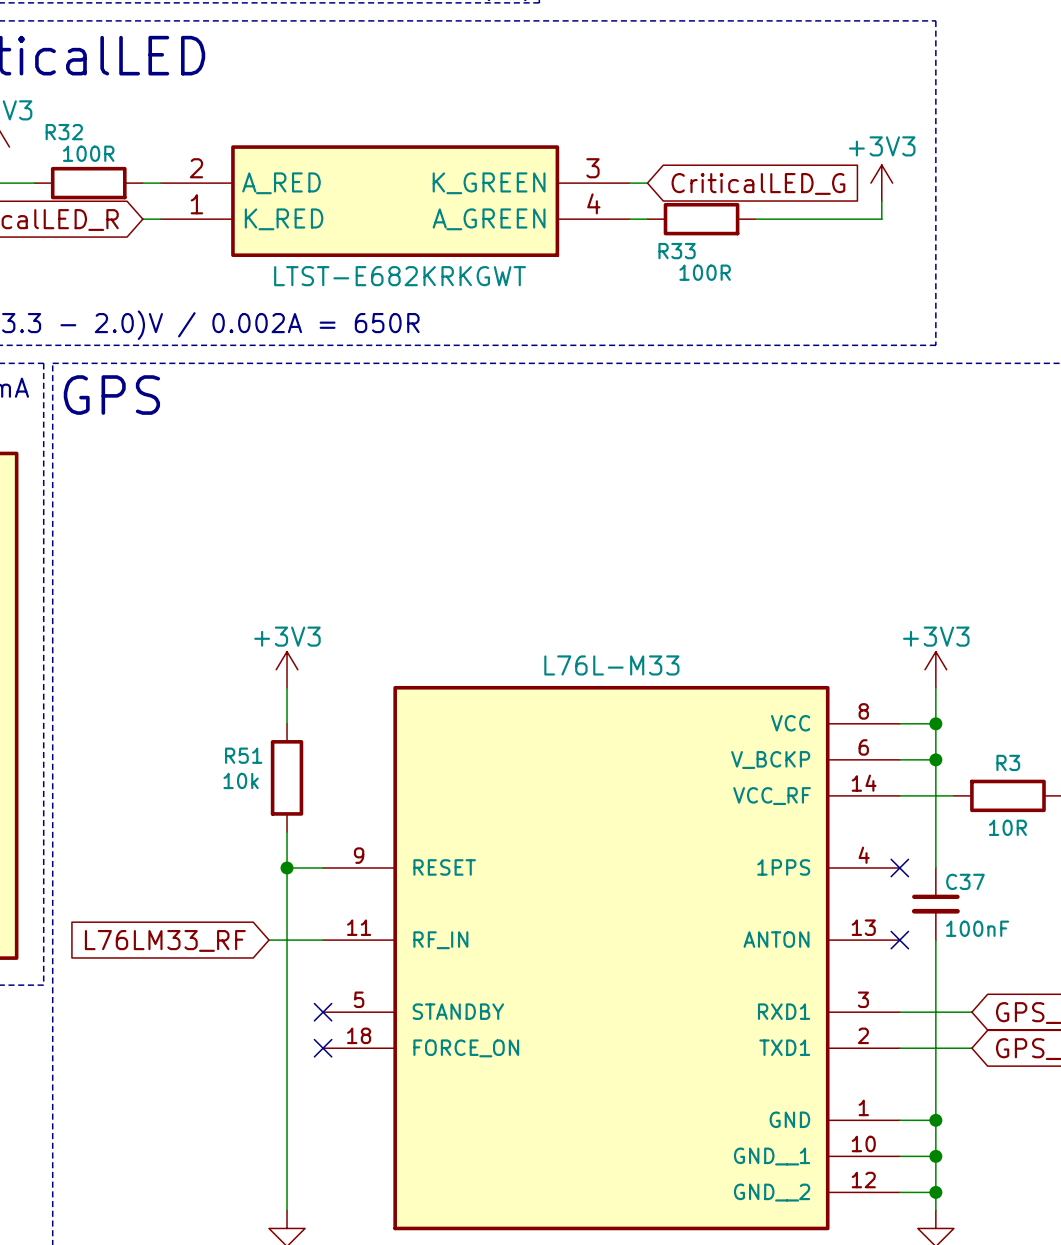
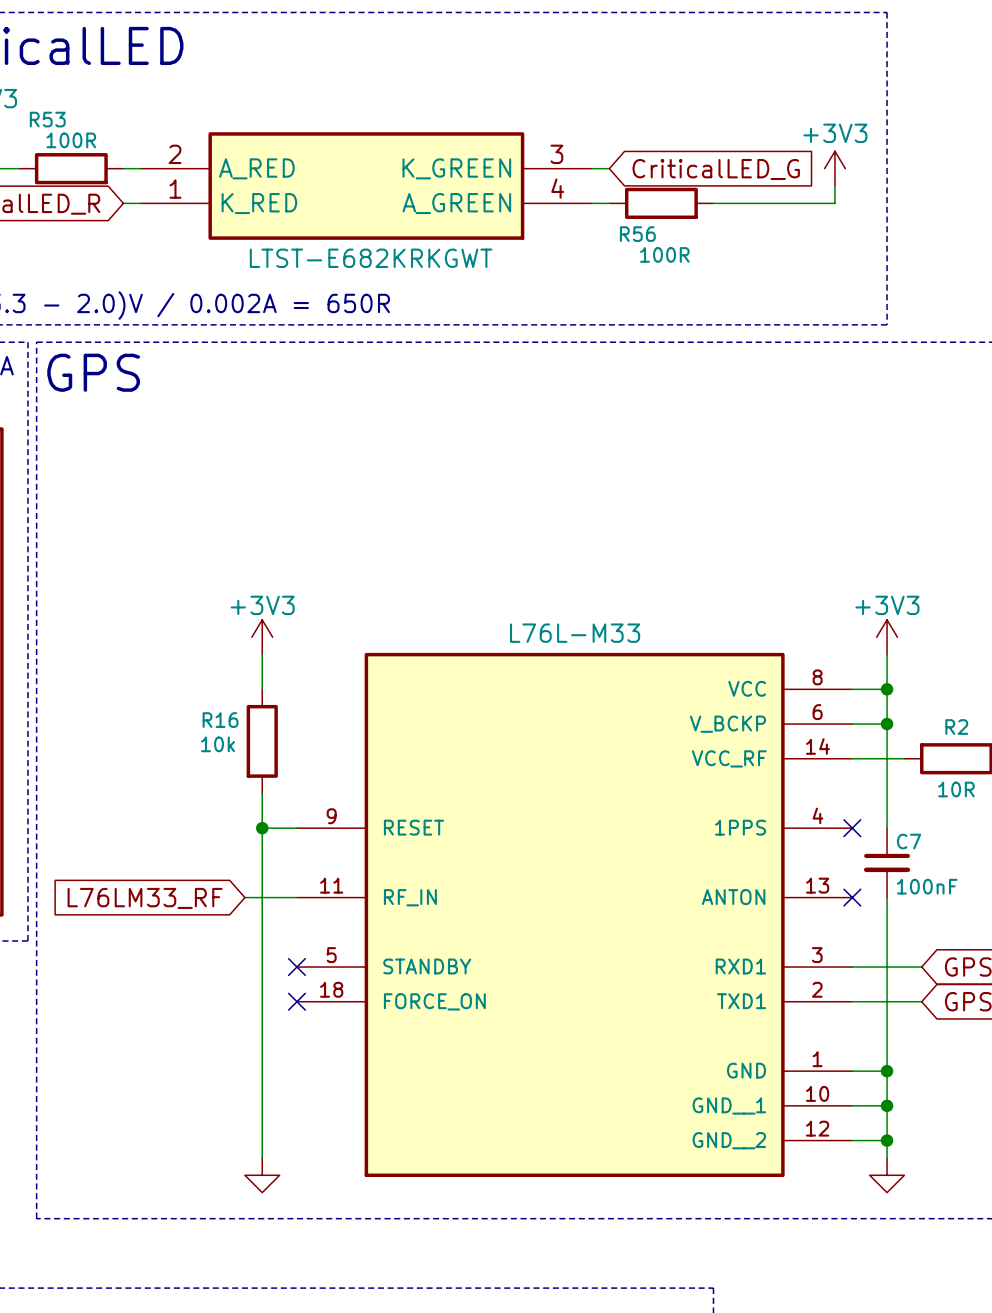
R32 name: R32 (64, 132) -> R53 (47, 119)
R33 name: R33 (677, 251) -> R56 (637, 234)
R51 name: R51 (243, 755) -> R16 (220, 720)
R3 name: R3 (1008, 762) -> R2 (956, 727)
C37 name: C37 (965, 881) -> C7 (909, 841)

